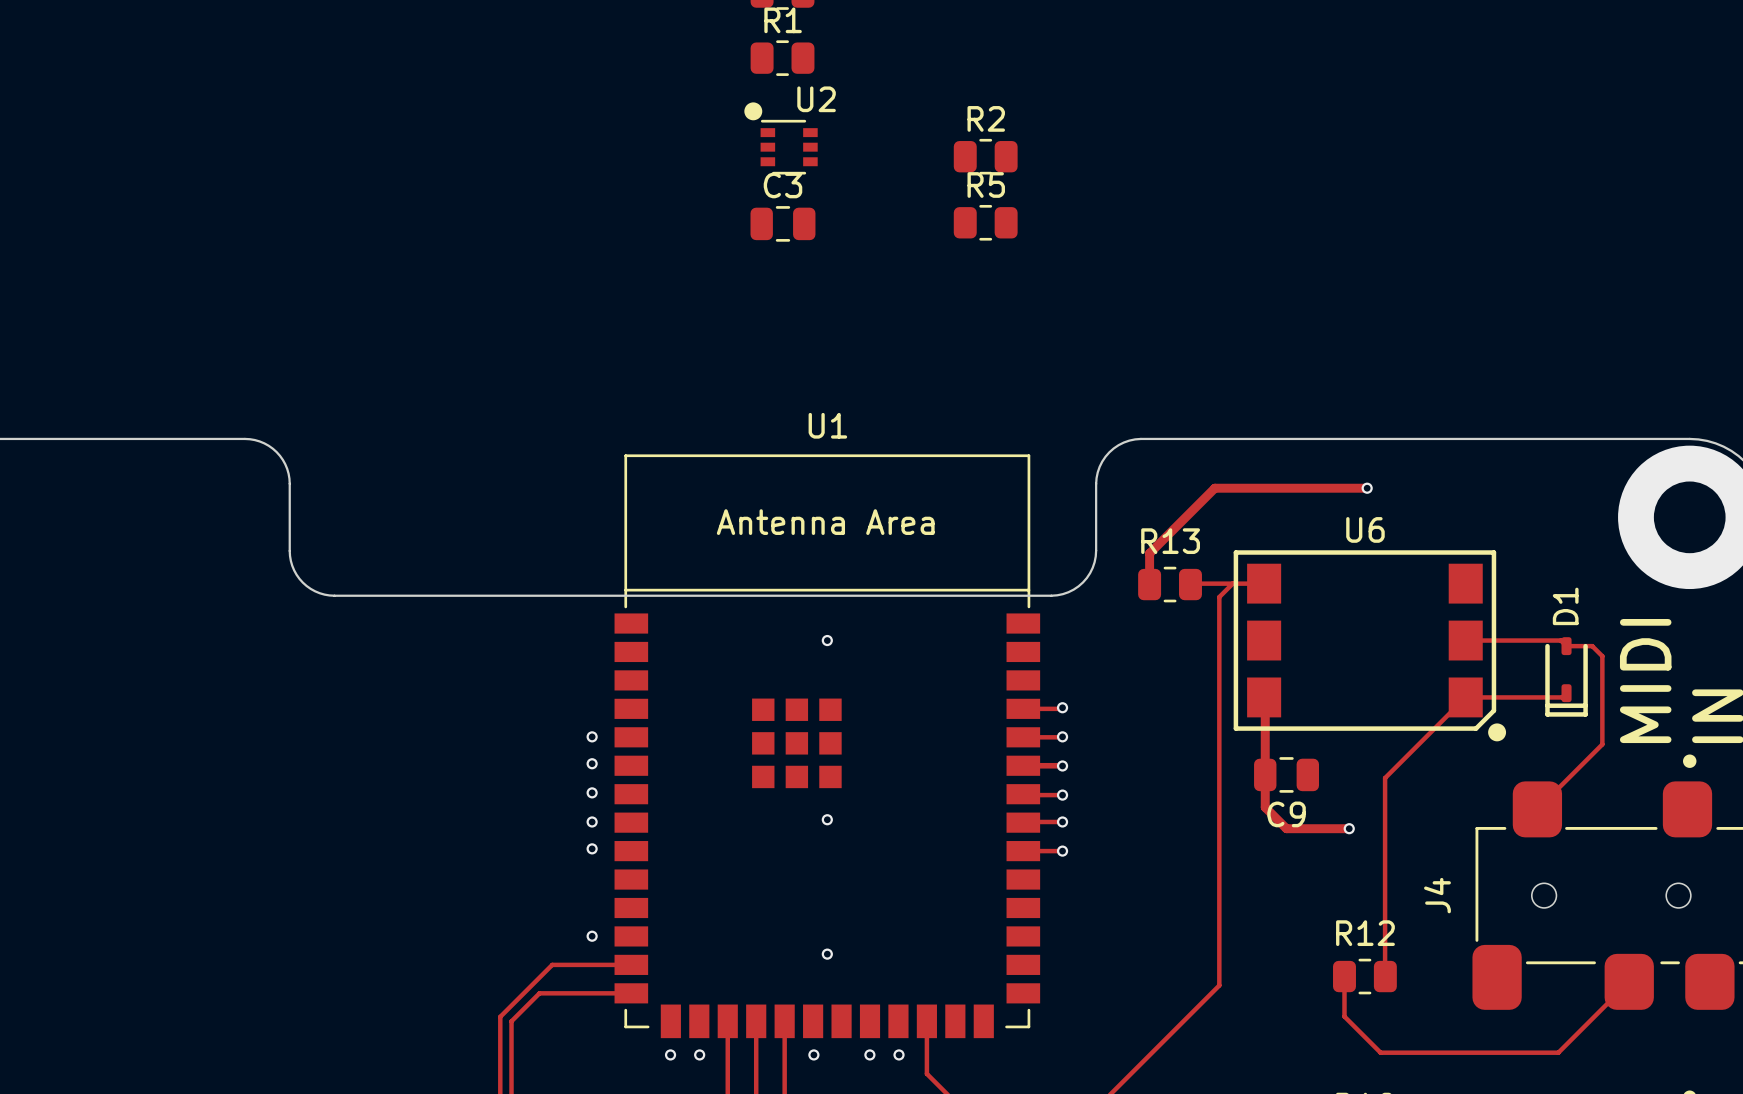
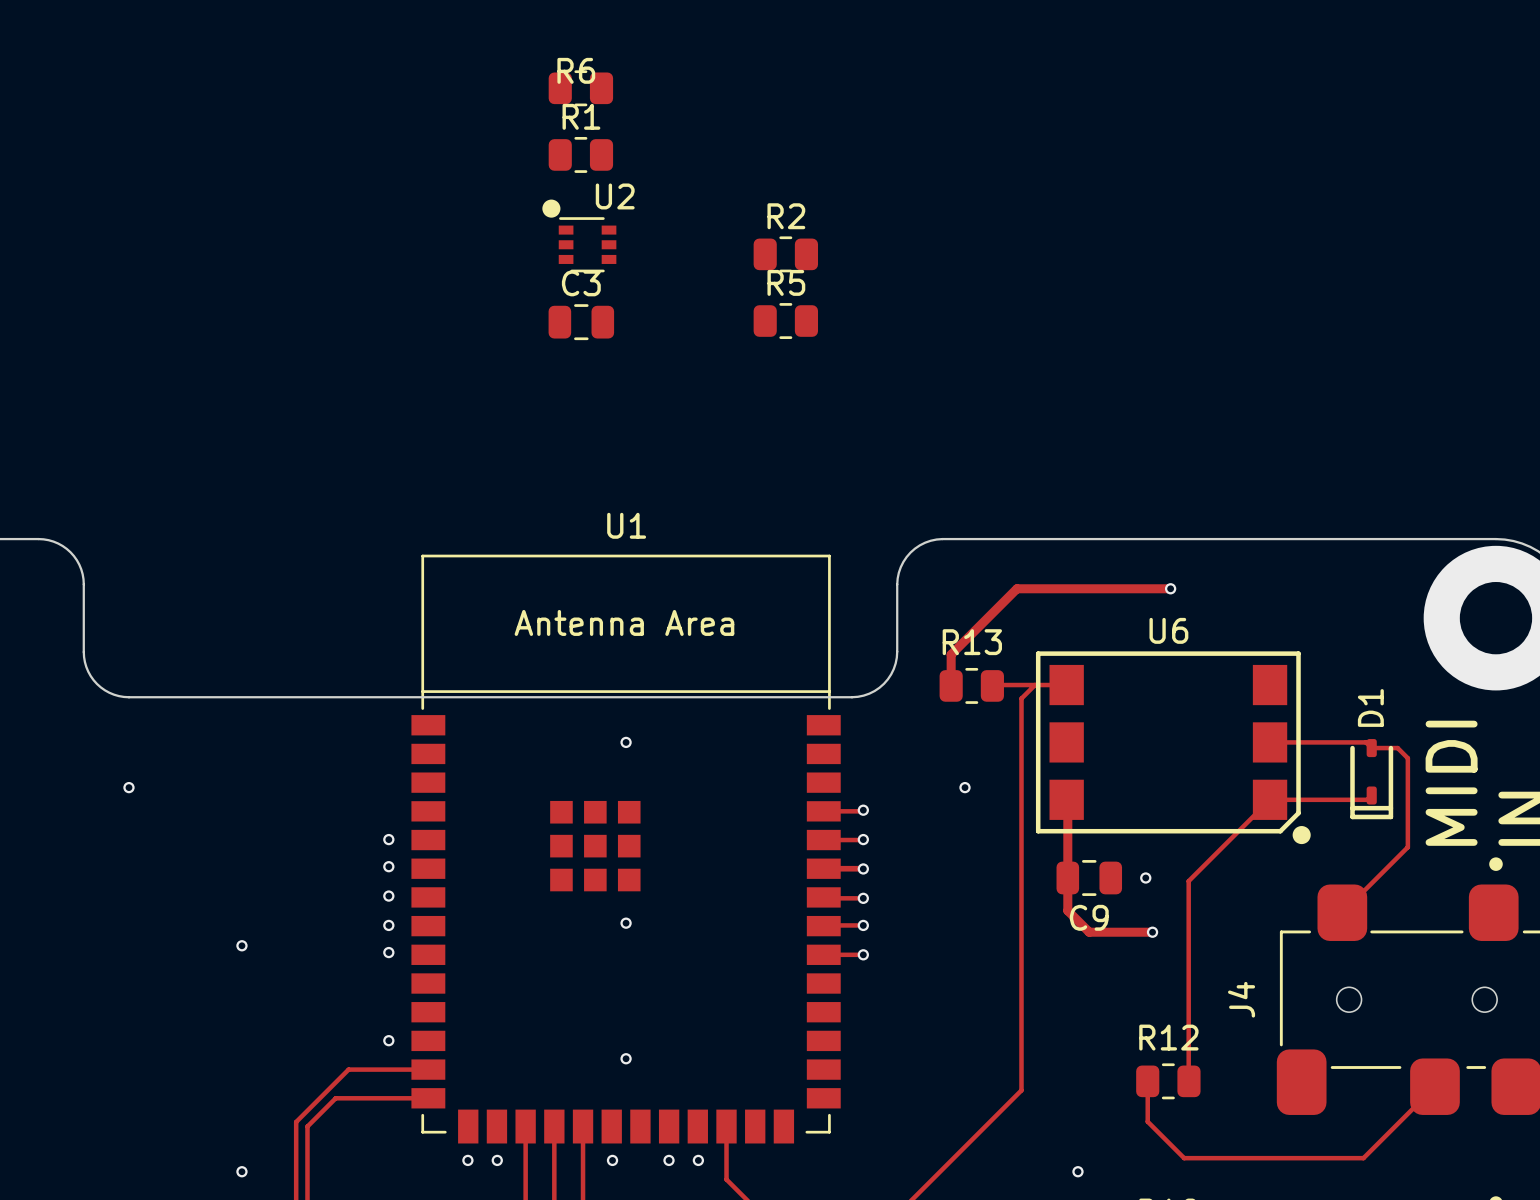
via: none -> (128, 787)
via: none -> (965, 787)
via: none -> (1145, 877)
via: none -> (241, 945)
via: none -> (241, 1171)
via: none -> (1077, 1171)

